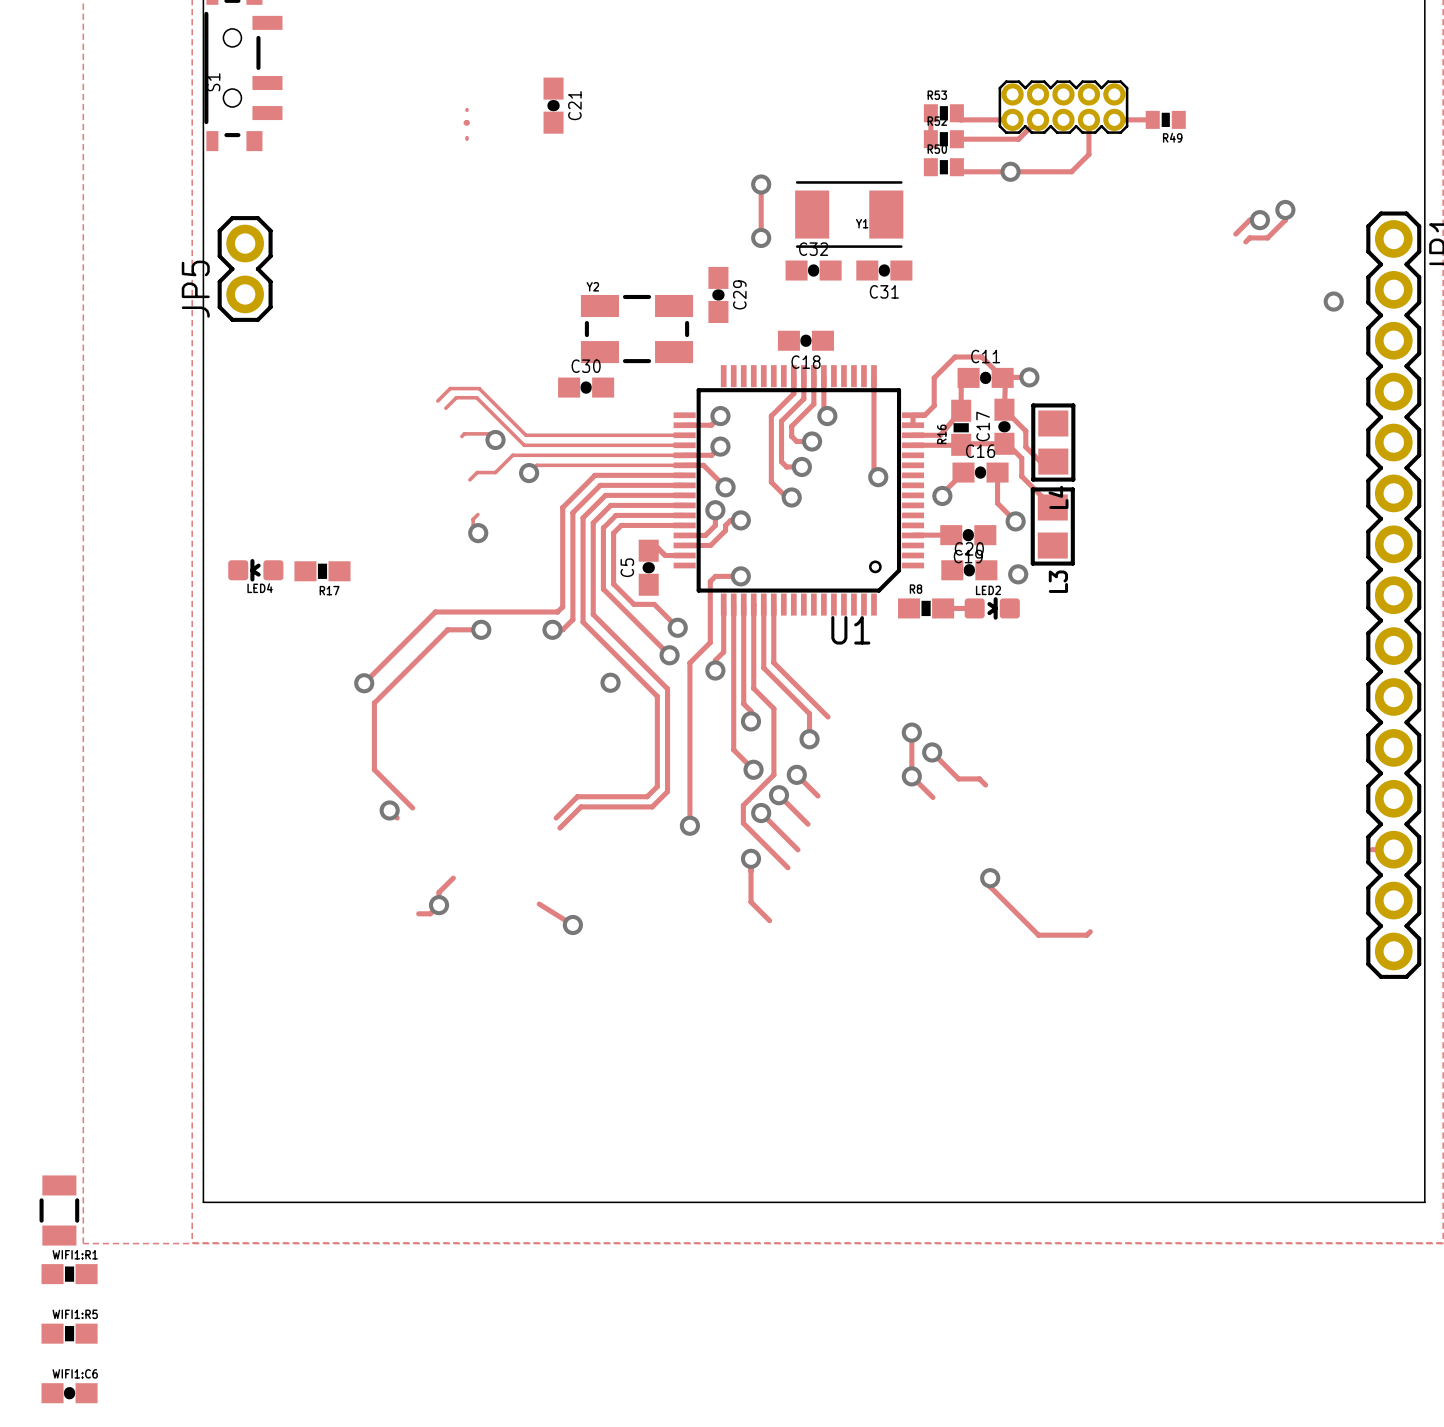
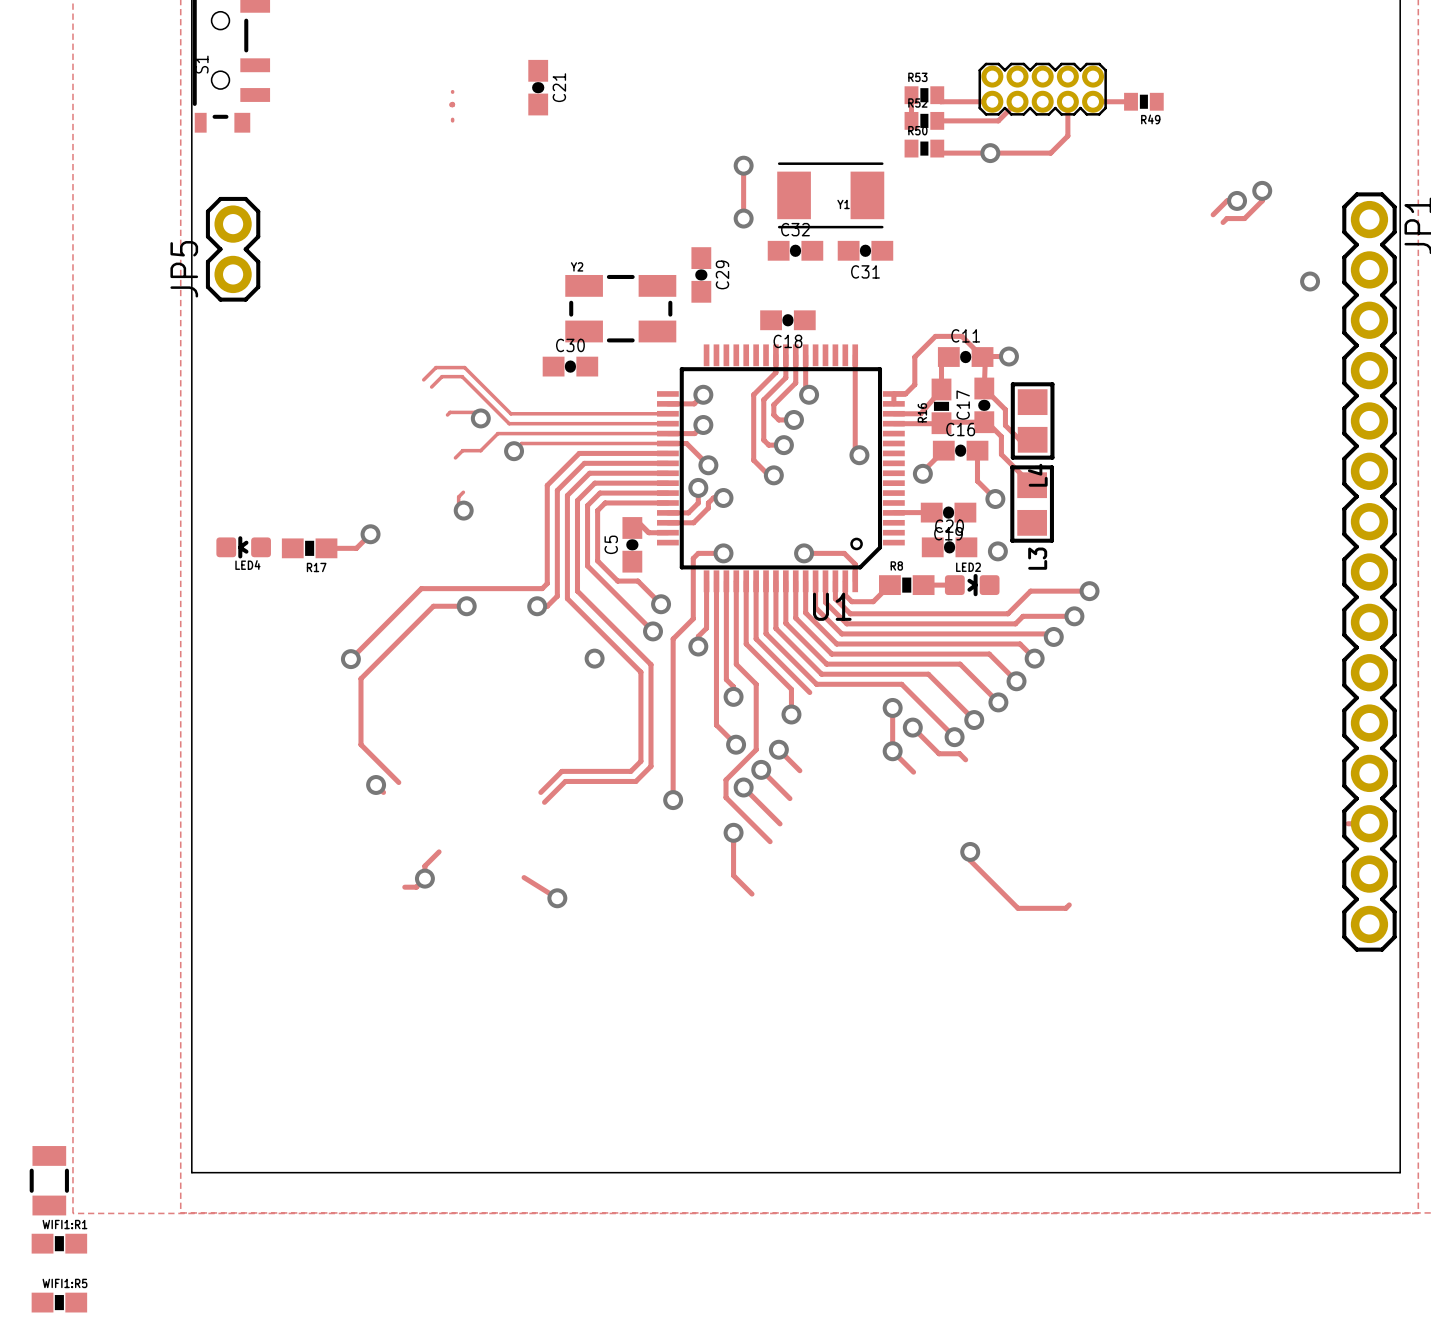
track: none -> (370, 534) (356, 548) (326, 548)
via: none -> (370, 534)
track: none -> (804, 553) (844, 553) (855, 564) (855, 581)
via: none -> (804, 553)
track: none -> (766, 581) (766, 633) (816, 684) (901, 684) (954, 737)
track: none -> (775, 581) (775, 628) (821, 674) (928, 674) (974, 720)
track: none -> (785, 581) (785, 623) (826, 664) (960, 664) (998, 702)
track: none -> (795, 581) (795, 618) (831, 654) (989, 654) (1016, 681)
track: none -> (805, 581) (805, 612) (836, 644) (1020, 644) (1034, 658)
track: none -> (815, 581) (815, 607) (841, 633) (1050, 633) (1053, 636)
track: none -> (825, 581) (825, 602) (846, 623) (1015, 623) (1023, 616) (1074, 616)
track: none -> (835, 581) (835, 598) (850, 613) (1007, 613) (1030, 591) (1089, 591)
track: none -> (845, 581) (845, 595) (851, 601) (873, 601) (889, 585)
via: none -> (1089, 591)
via: none -> (1074, 616)
via: none -> (1053, 636)
via: none -> (1034, 658)
via: none -> (1016, 681)
via: none -> (998, 702)
via: none -> (974, 720)
via: none -> (954, 737)

